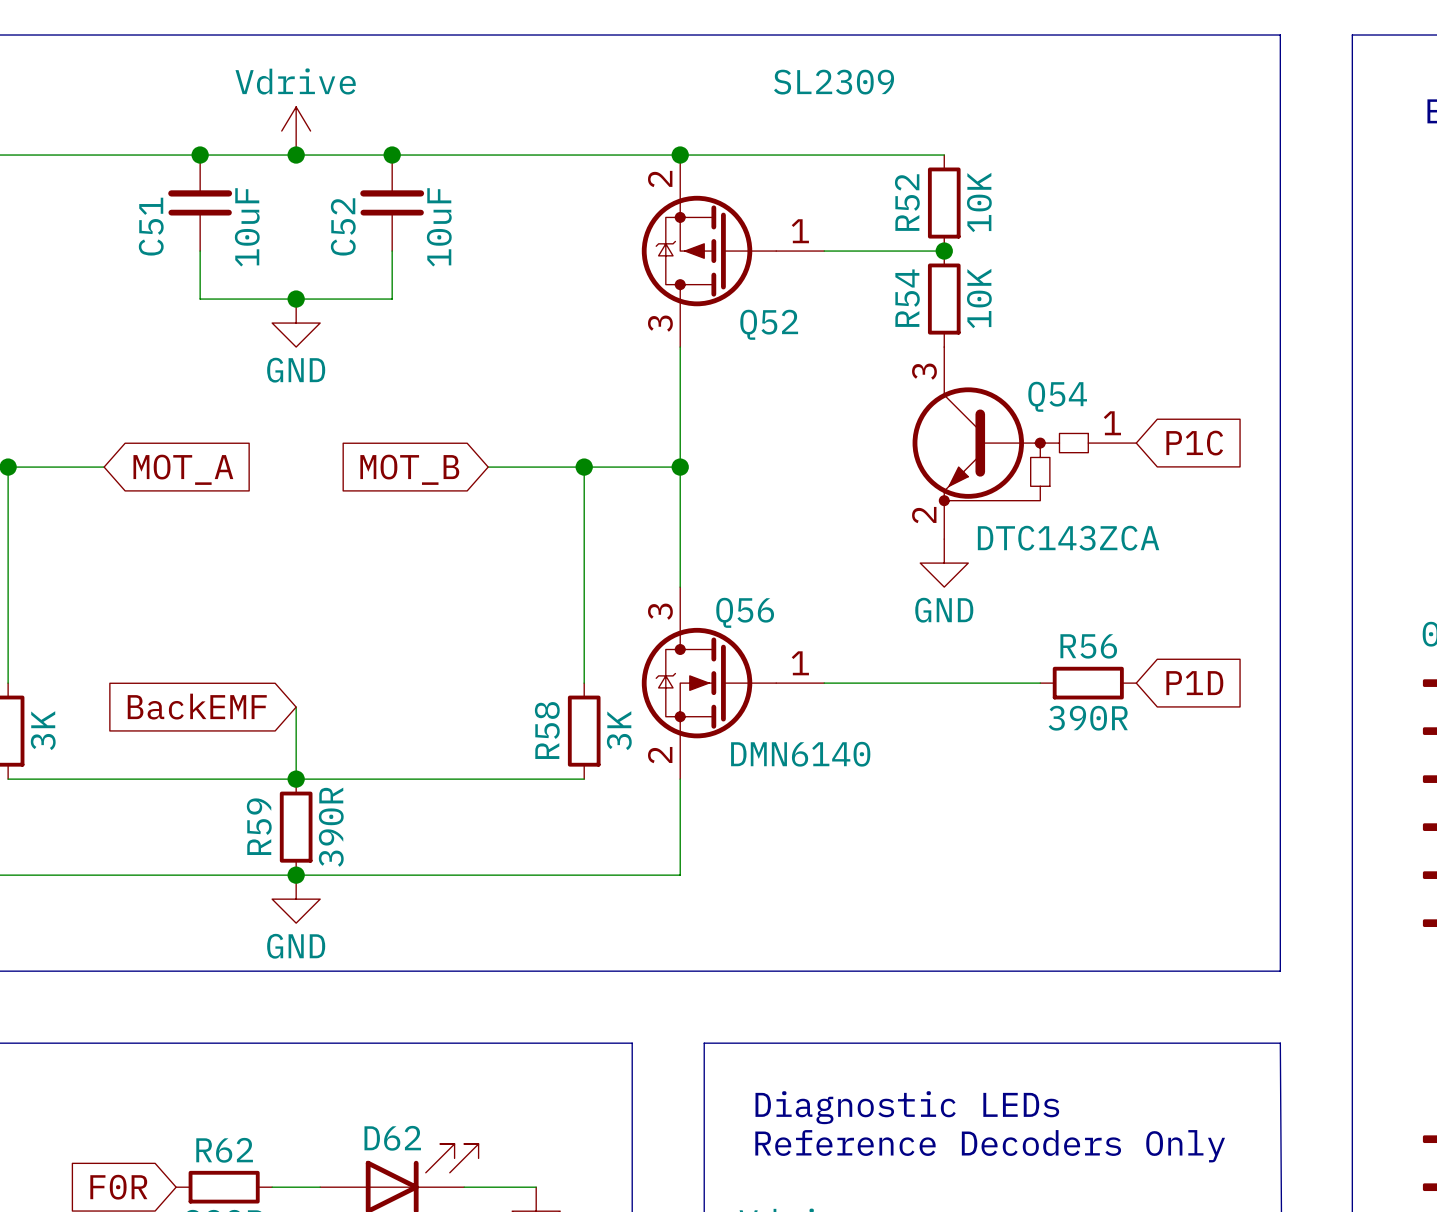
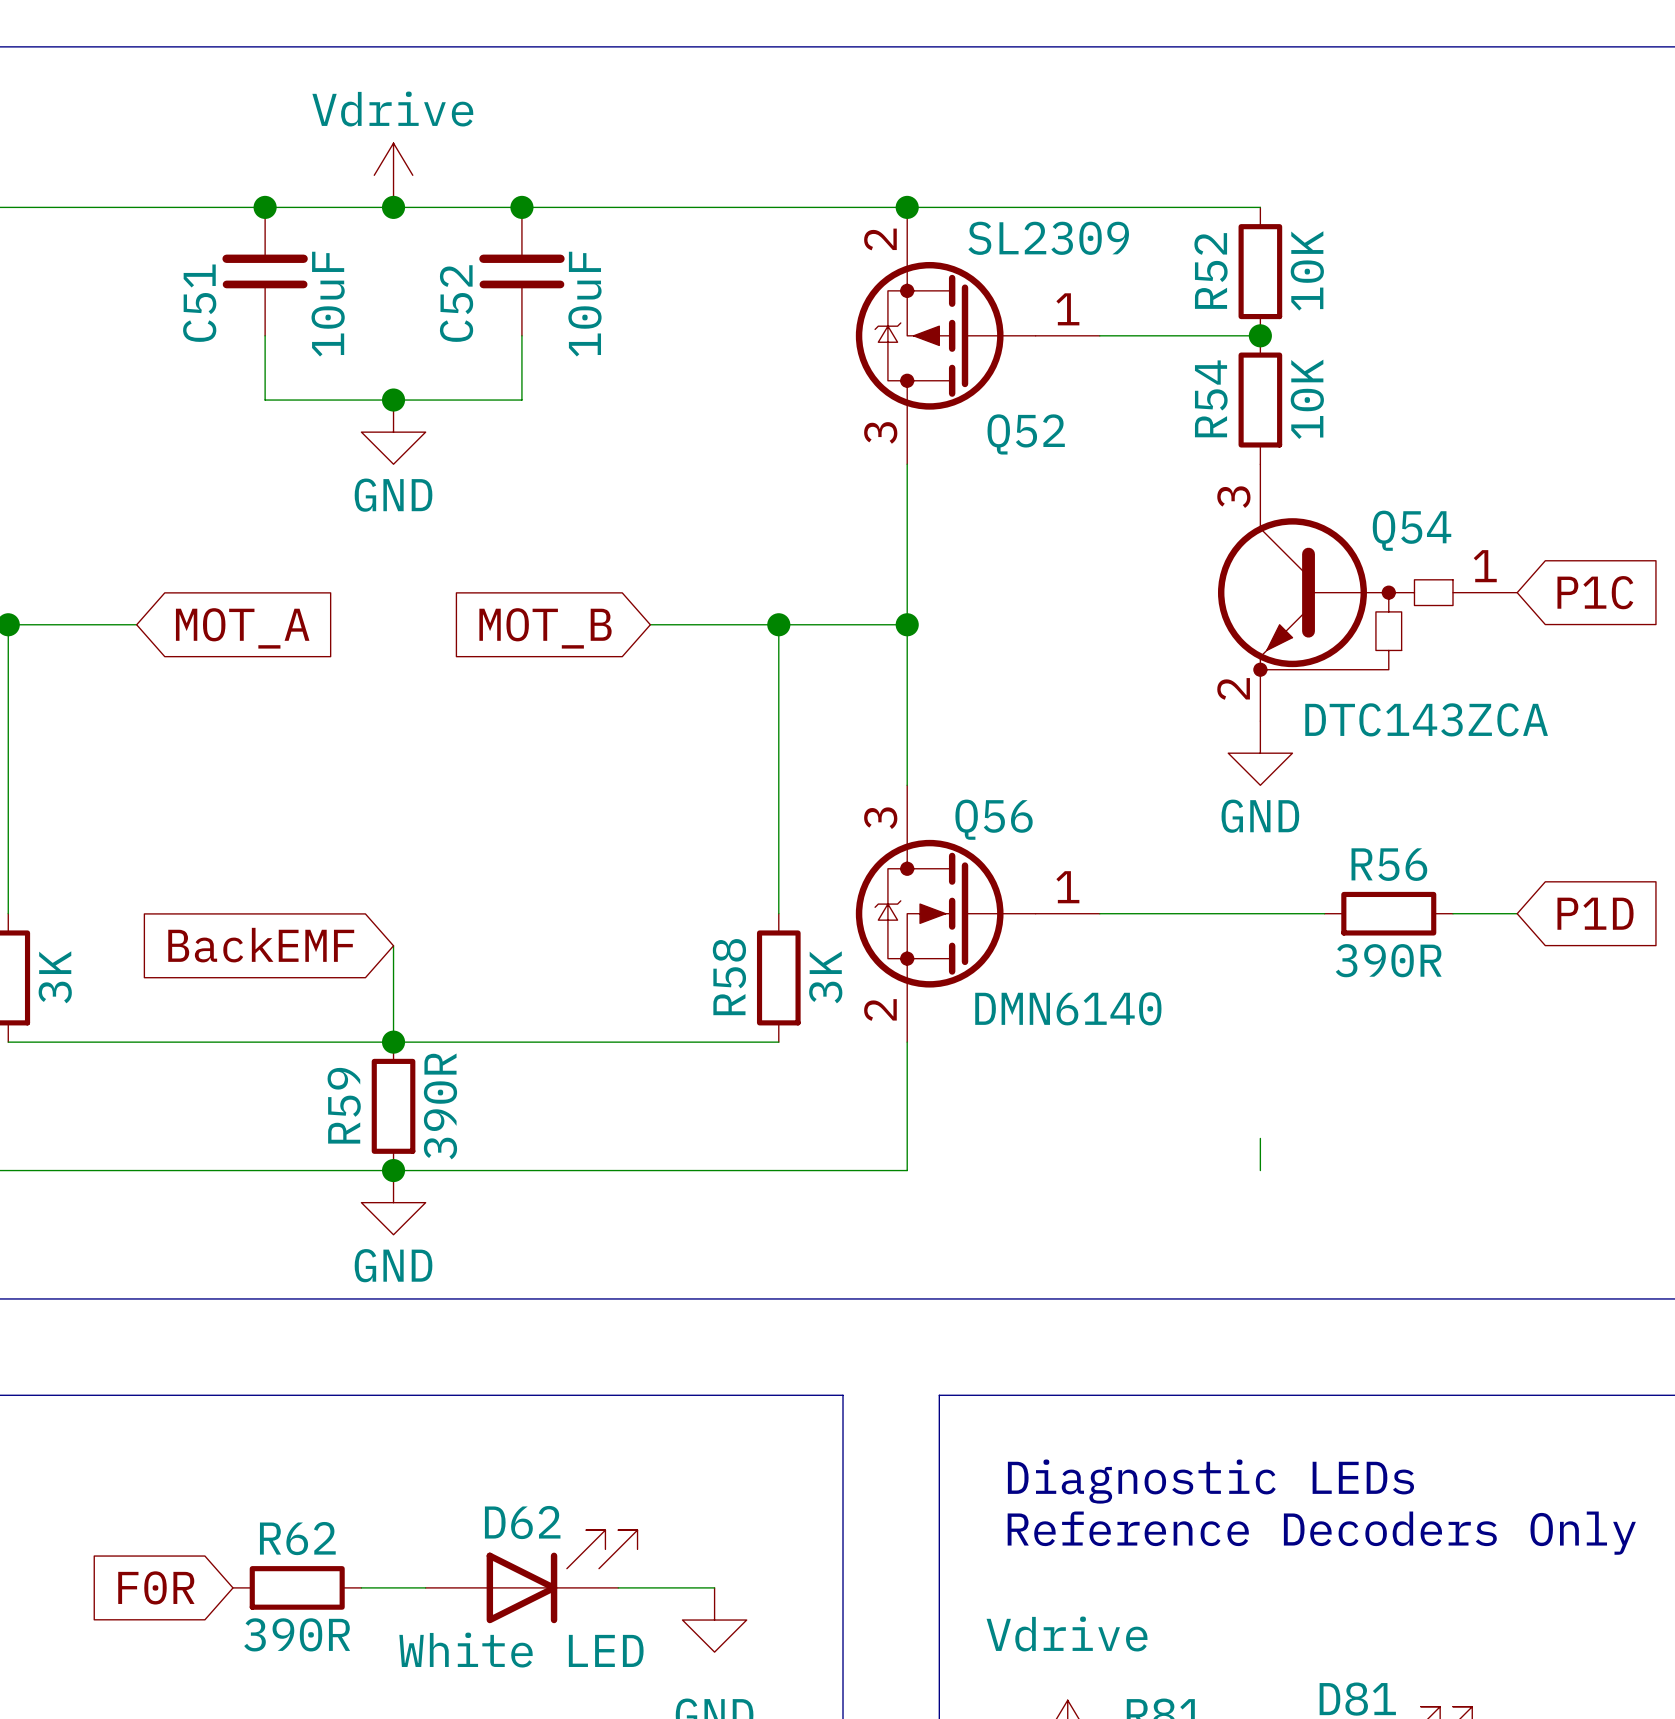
Q52 value position: SL2309 (834, 82) -> SL2309 (1048, 238)
wire: (992, 683) (1040, 683) -> (1453, 913) (1517, 913)
R56 position: (1088, 683) -> (1388, 913)
wire: none -> (1260, 1138) (1260, 1170)

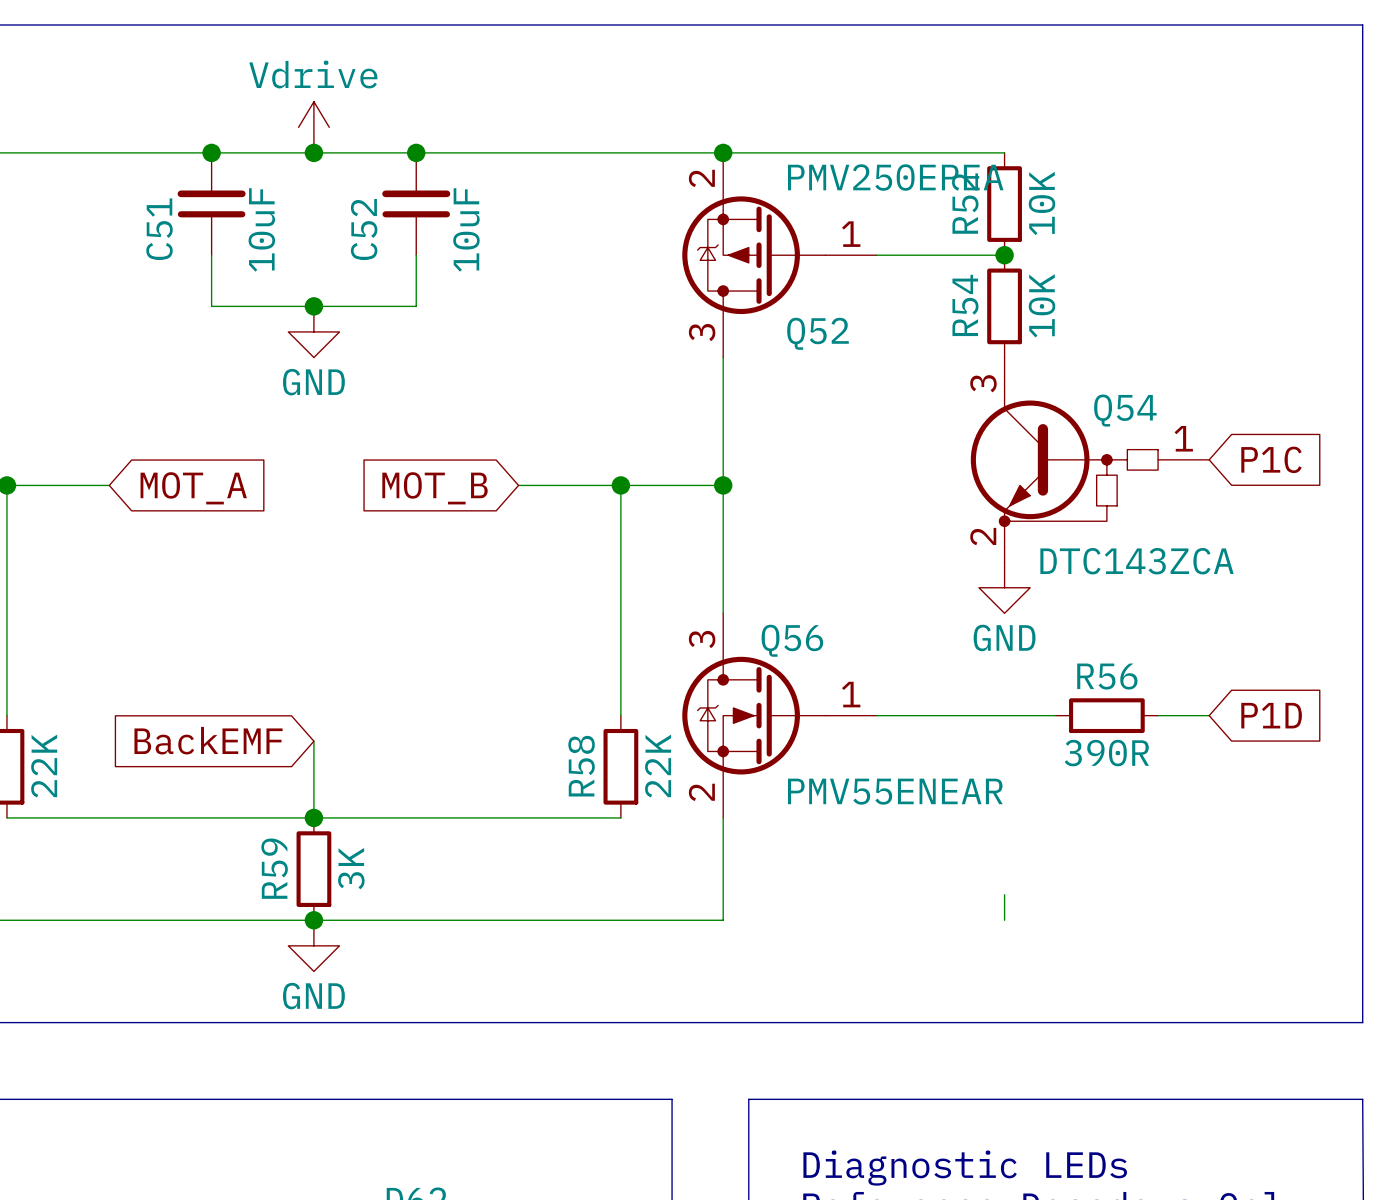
Q52 value: SL2309 (1048, 238) -> PMV250EPEA (895, 177)
part value: 3K (55, 977) -> 22K (44, 766)
R58 value: 3K (825, 977) -> 22K (658, 766)
Q56 value: DMN6140 (1068, 1008) -> PMV55ENEAR (895, 791)
R59 value: 390R (440, 1106) -> 3K (351, 868)

